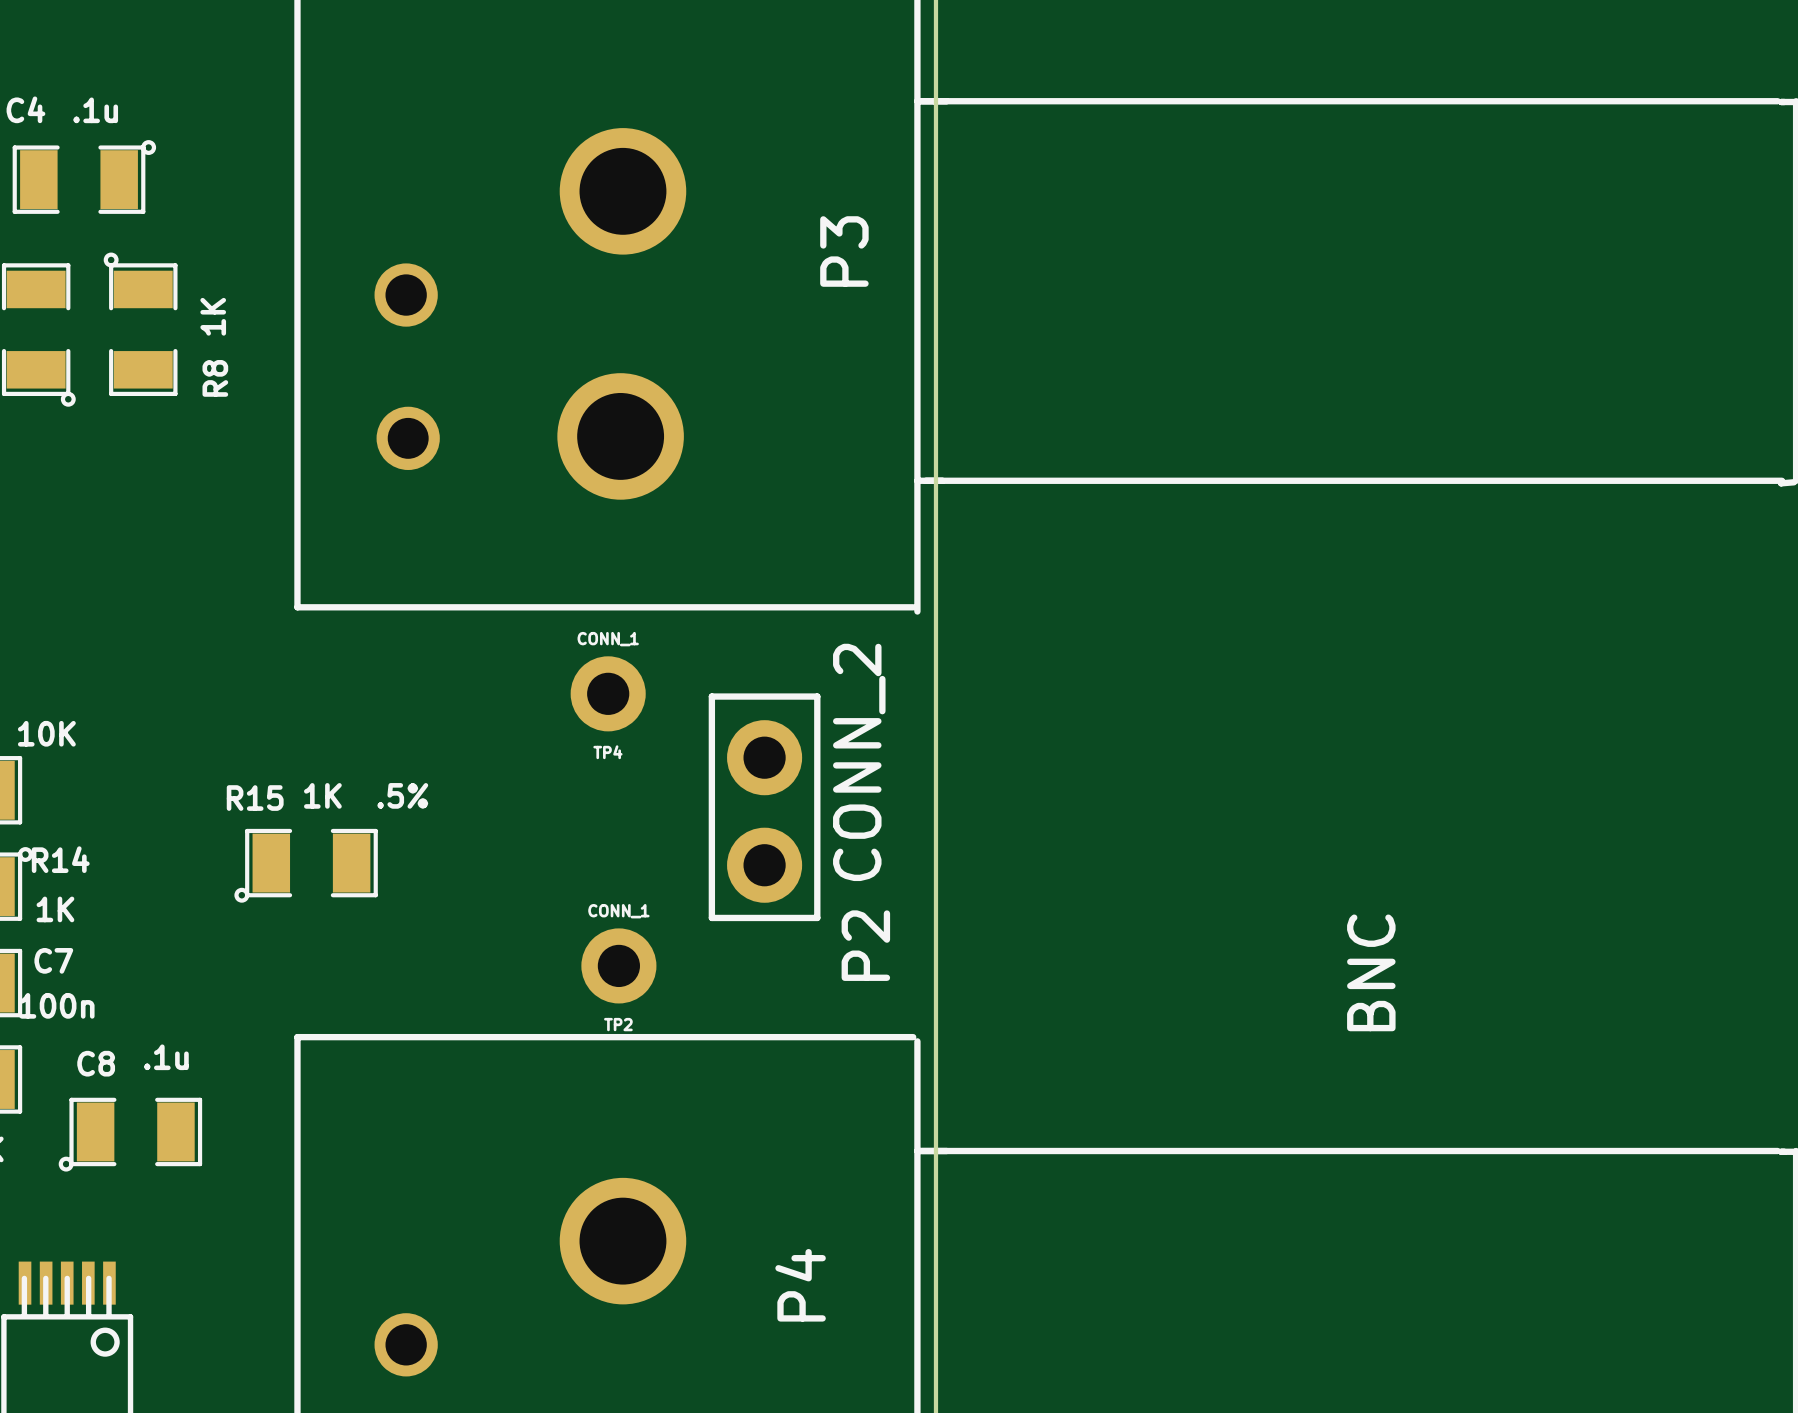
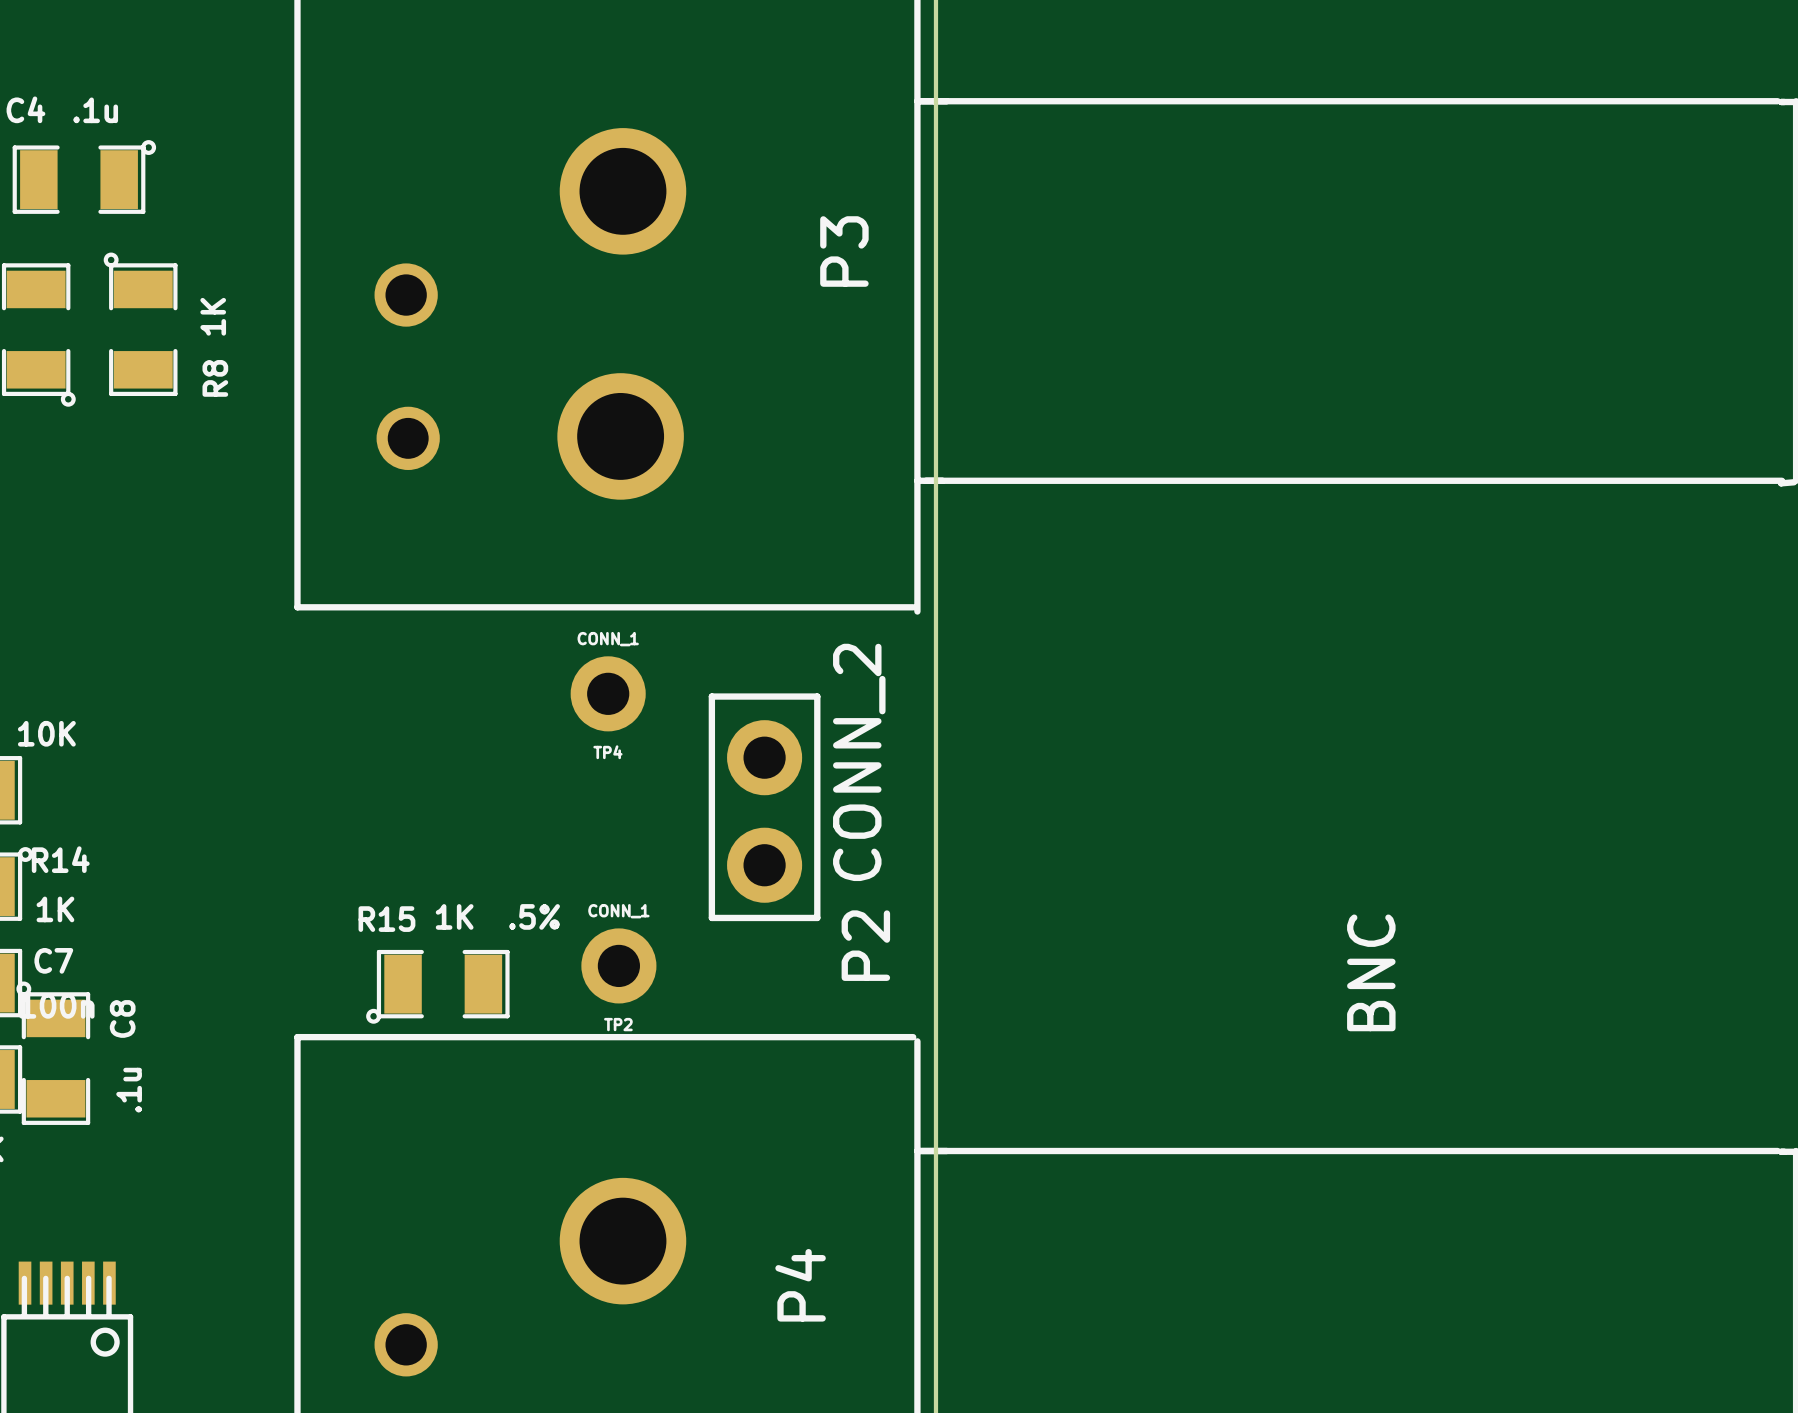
R15 position: (306, 865) -> (437, 986)
C8 rotation: 0° (130, 1134) -> 90° clockwise (53, 1053)
C8 position: (130, 1134) -> (53, 1053)

